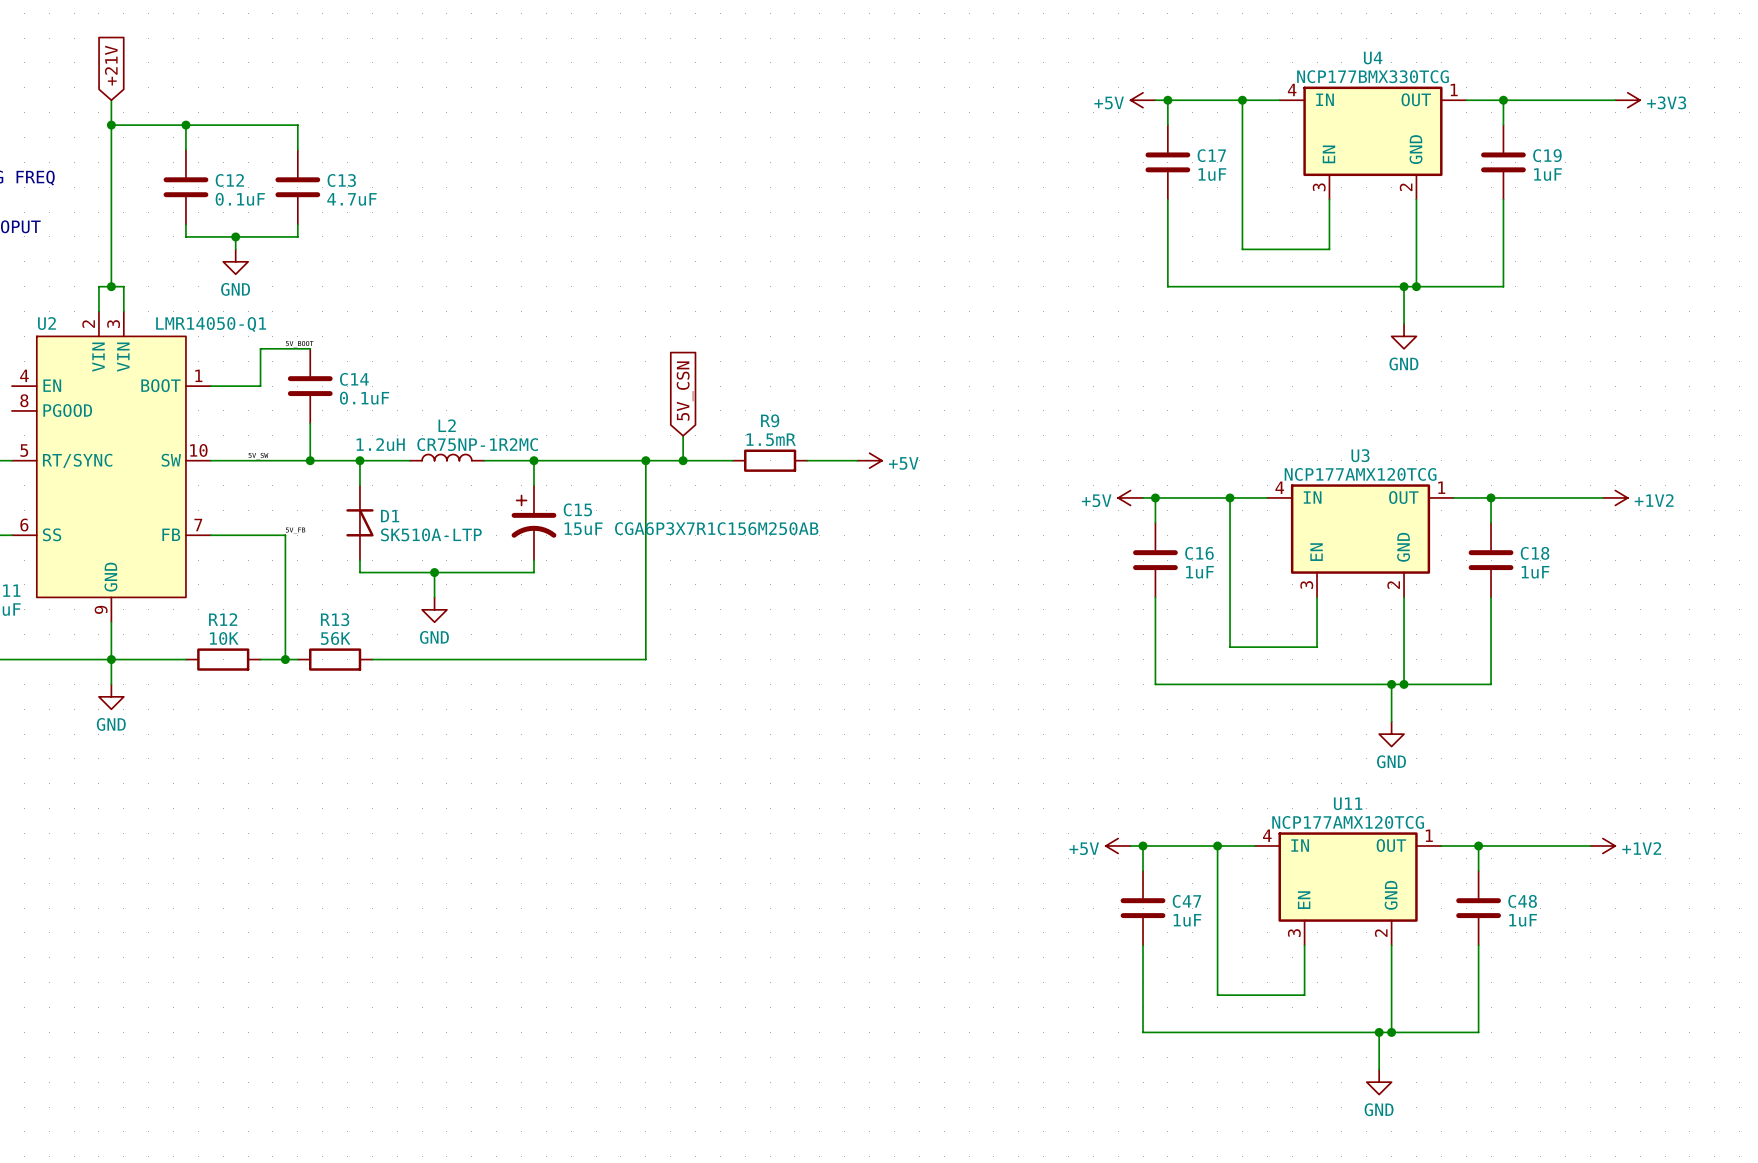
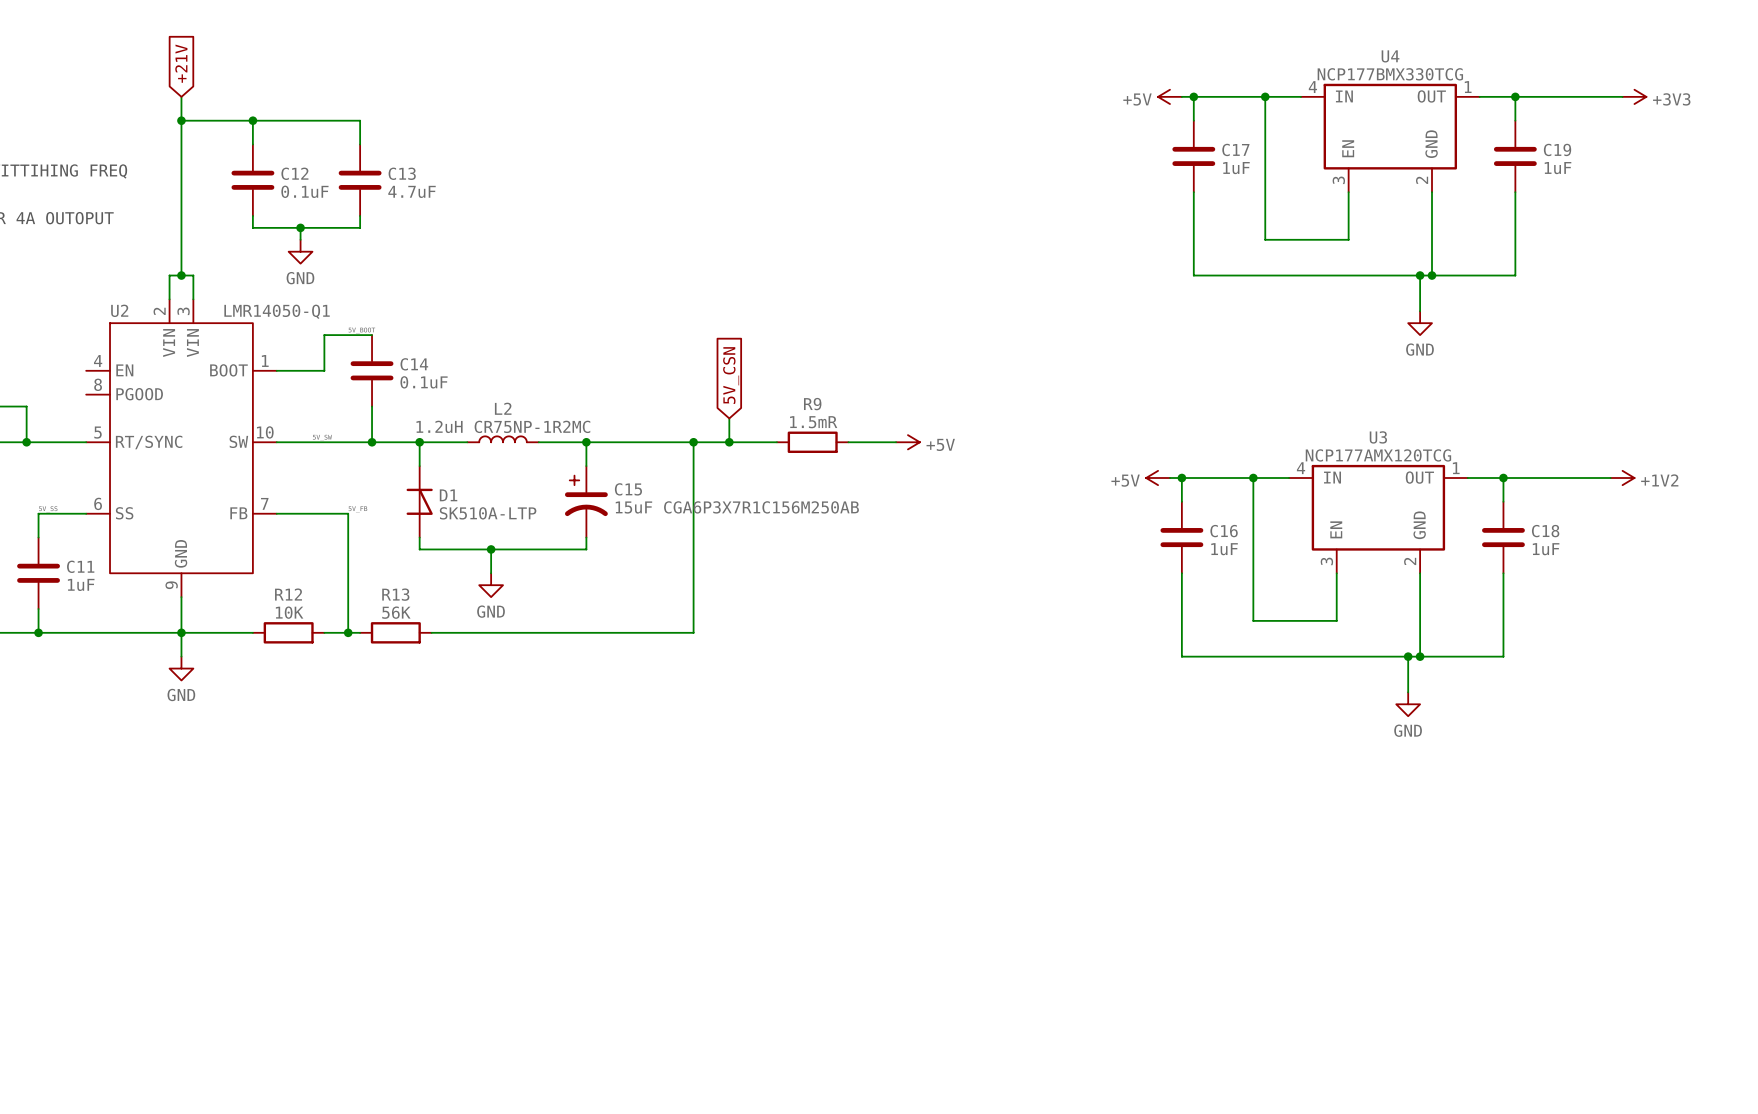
power symbol: +5V (1118, 845) -> none
wire: (1130, 845) (1254, 845) -> none
wire: (1143, 845) (1143, 870) -> none
junction: (1143, 845) -> none
wire: (1217, 845) (1217, 995) (1304, 995) (1304, 945) -> none
junction: (1217, 845) -> none
wire: (1441, 845) (1590, 845) -> none
wire: (1478, 845) (1478, 870) -> none
junction: (1478, 845) -> none
power symbol: +1V2 (1602, 845) -> none
U11: NCP177AMX120TCG (1348, 888) -> none
C47: 1uF (1143, 908) -> none
C48: 1uF (1478, 908) -> none
wire: (1143, 945) (1143, 1032) (1478, 1032) (1478, 945) -> none
wire: (1391, 945) (1391, 1032) -> none
wire: (1379, 1032) (1379, 1069) -> none
junction: (1379, 1032) -> none
junction: (1391, 1032) -> none
power symbol: GND (1379, 1082) -> none

